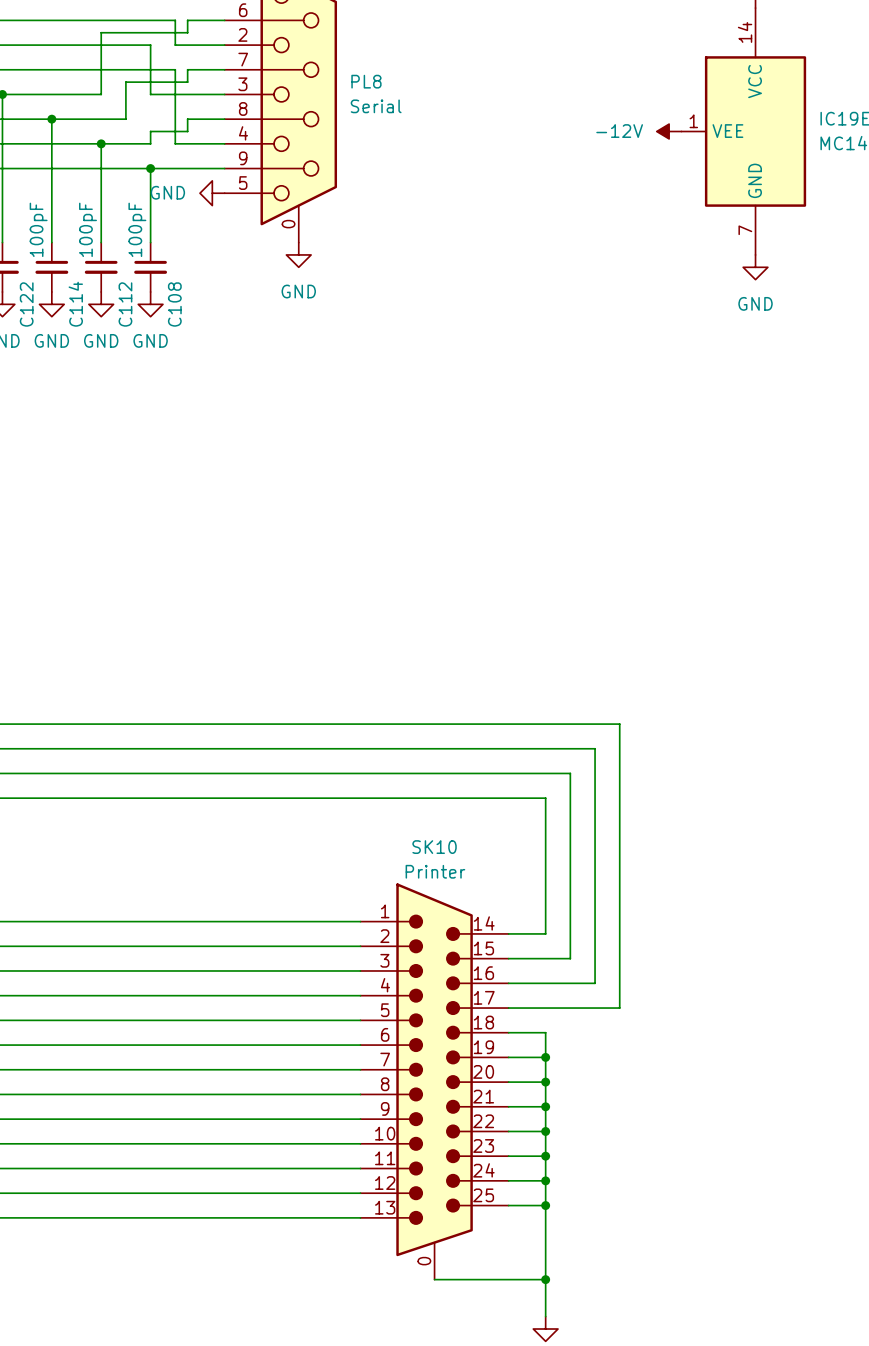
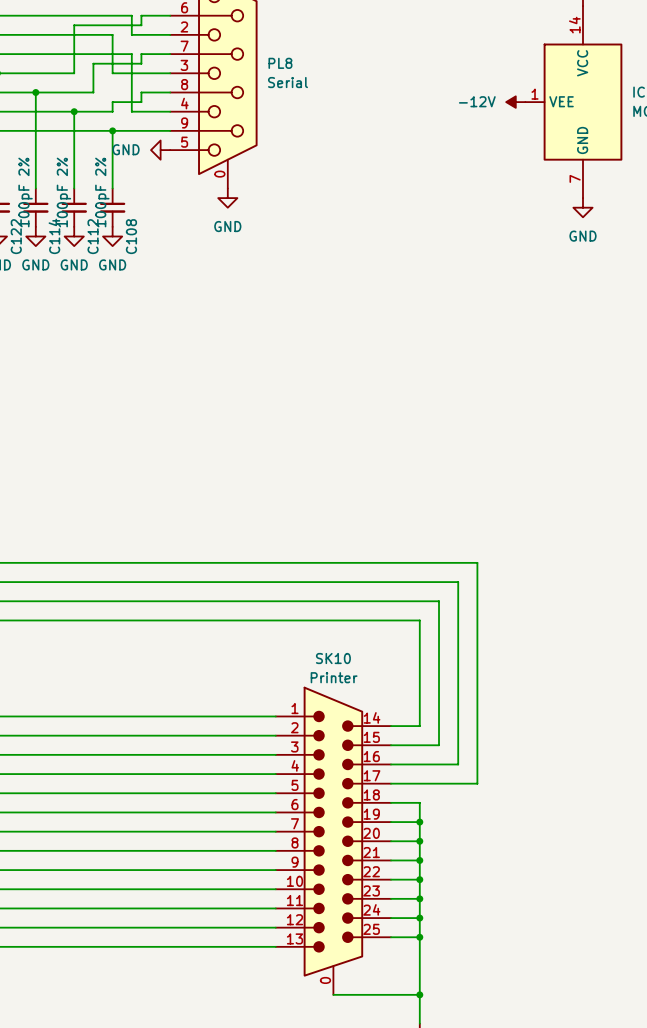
C114 value: 100pF (38, 229) -> 100pF 2% (25, 192)
C112 value: 100pF (88, 229) -> 100pF 2% (63, 192)
C108 value: 100pF (137, 229) -> 100pF 2% (102, 192)

